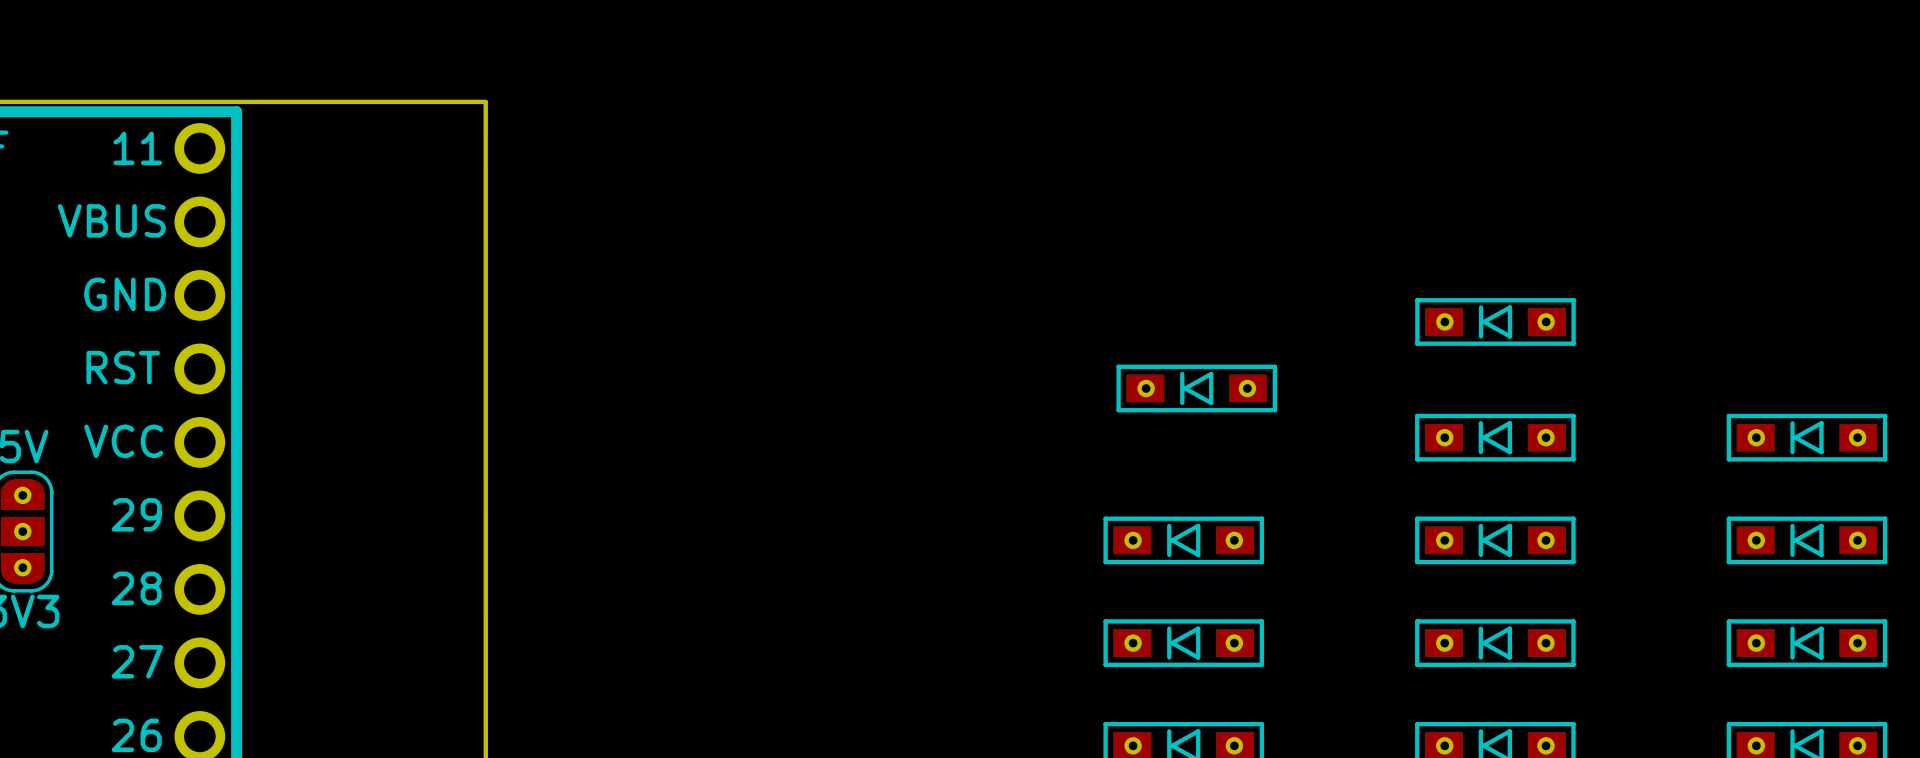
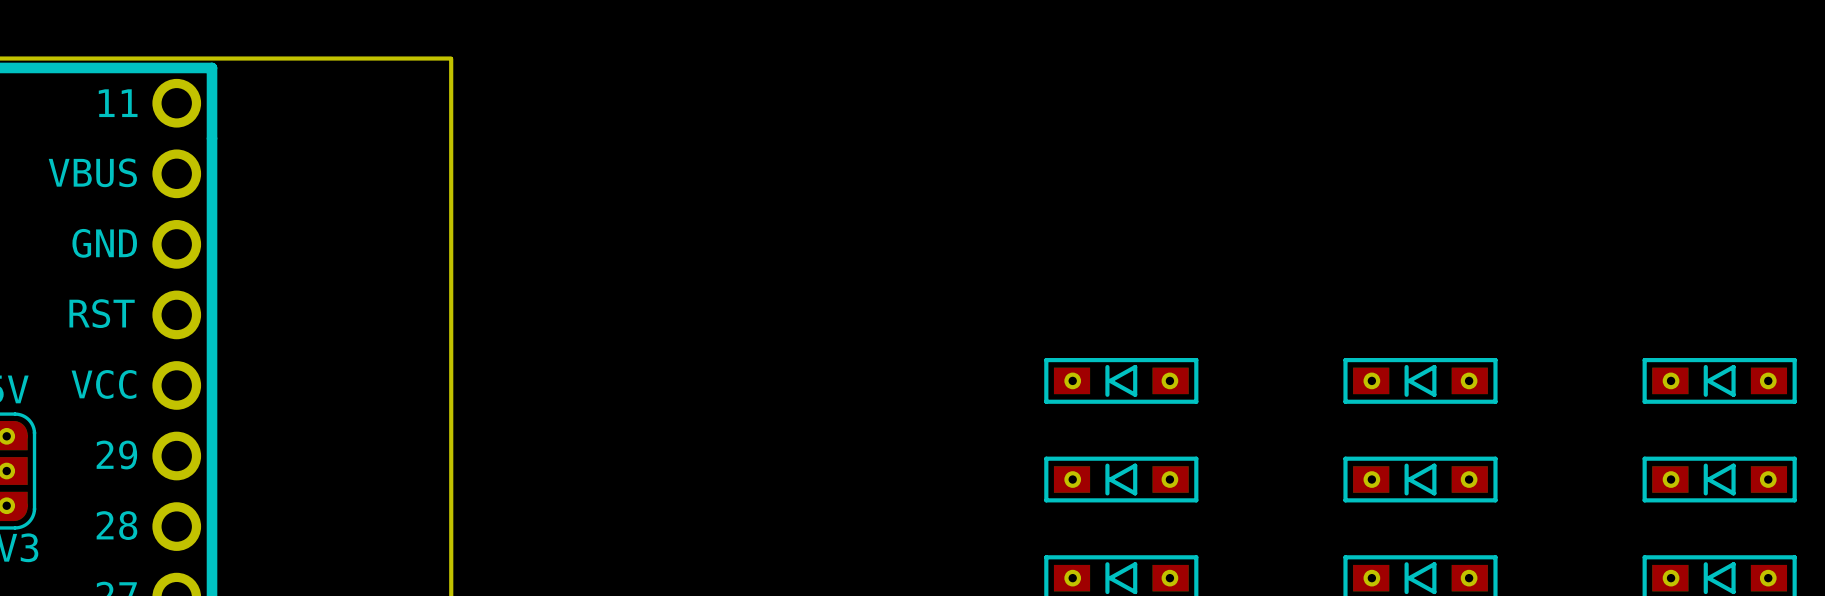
part: (1495, 321) -> none
part position: (1196, 388) -> (1121, 380)

